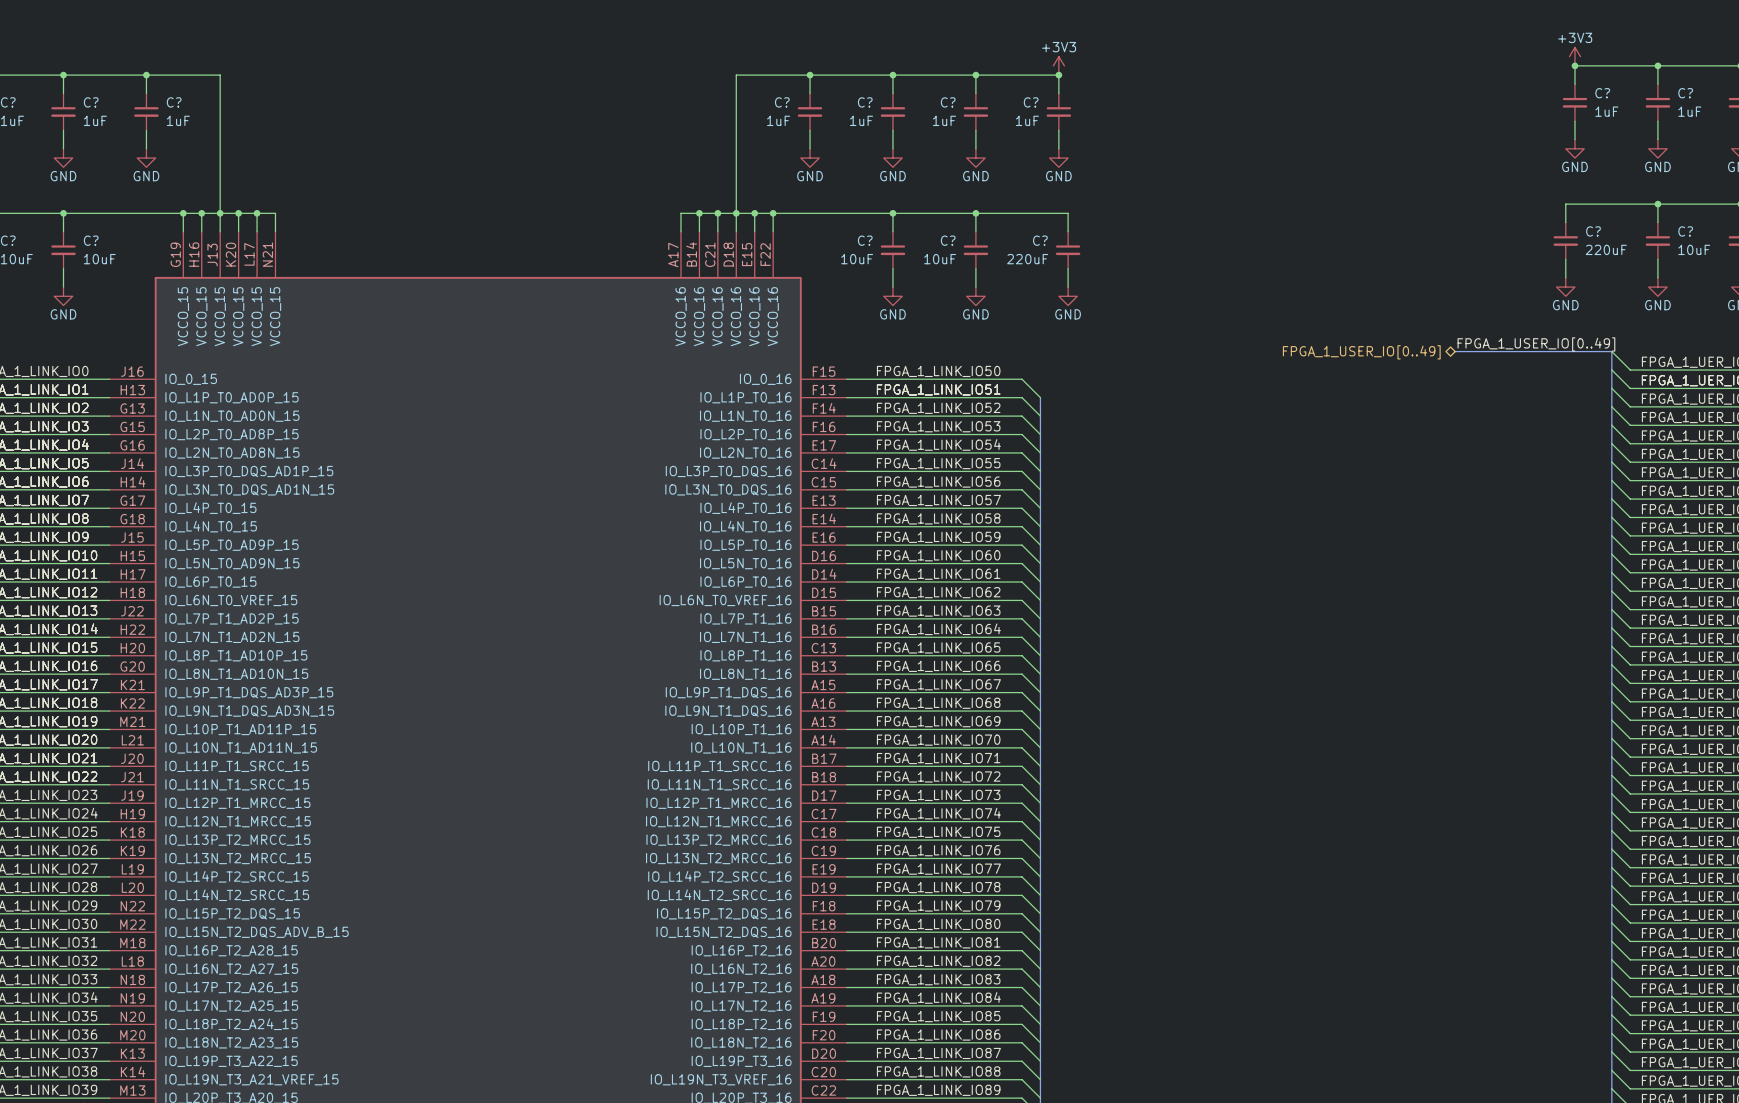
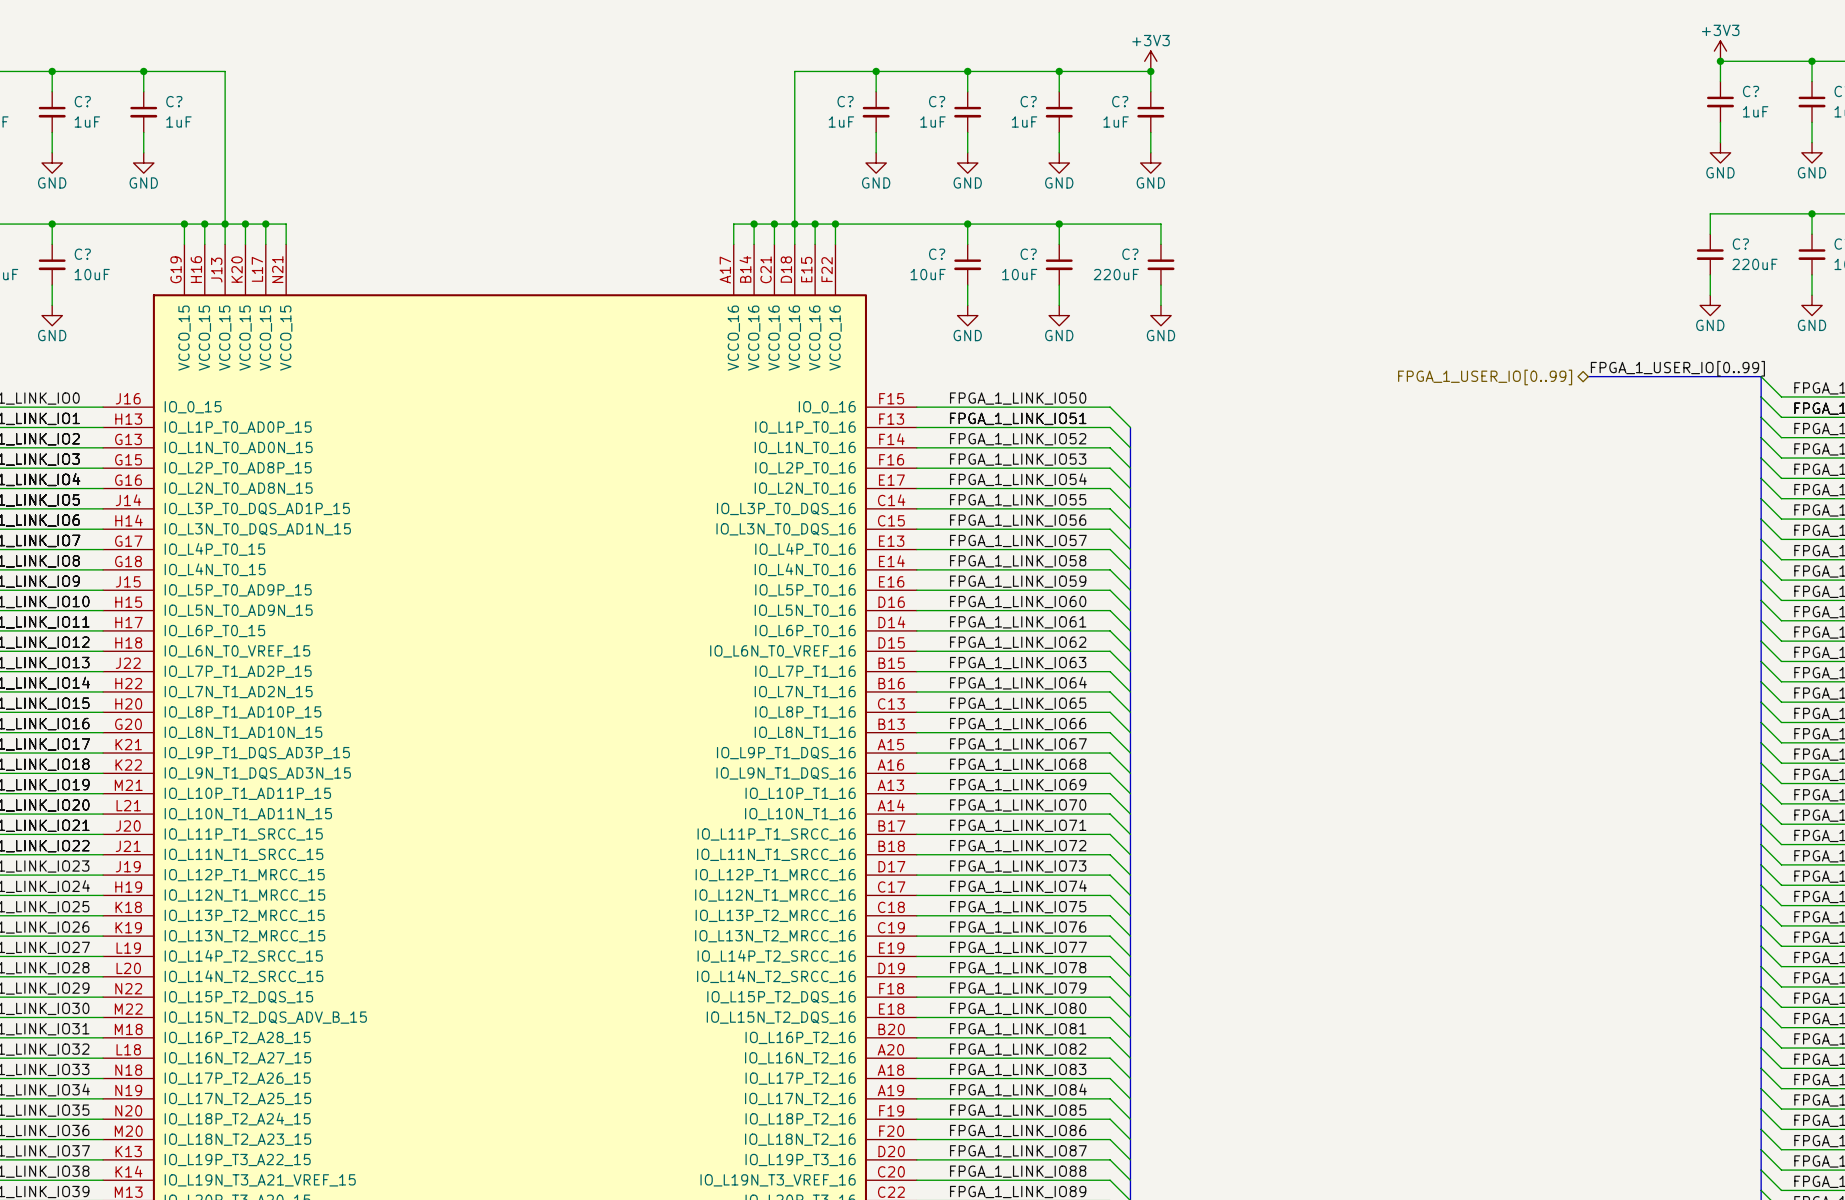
label: FPGA_1_USER_IO[0..49] (1536, 344) -> FPGA_1_USER_IO[0..99] (1677, 368)
hierarchical label: FPGA_1_USER_IO[0..49] (1361, 352) -> FPGA_1_USER_IO[0..99] (1485, 377)

